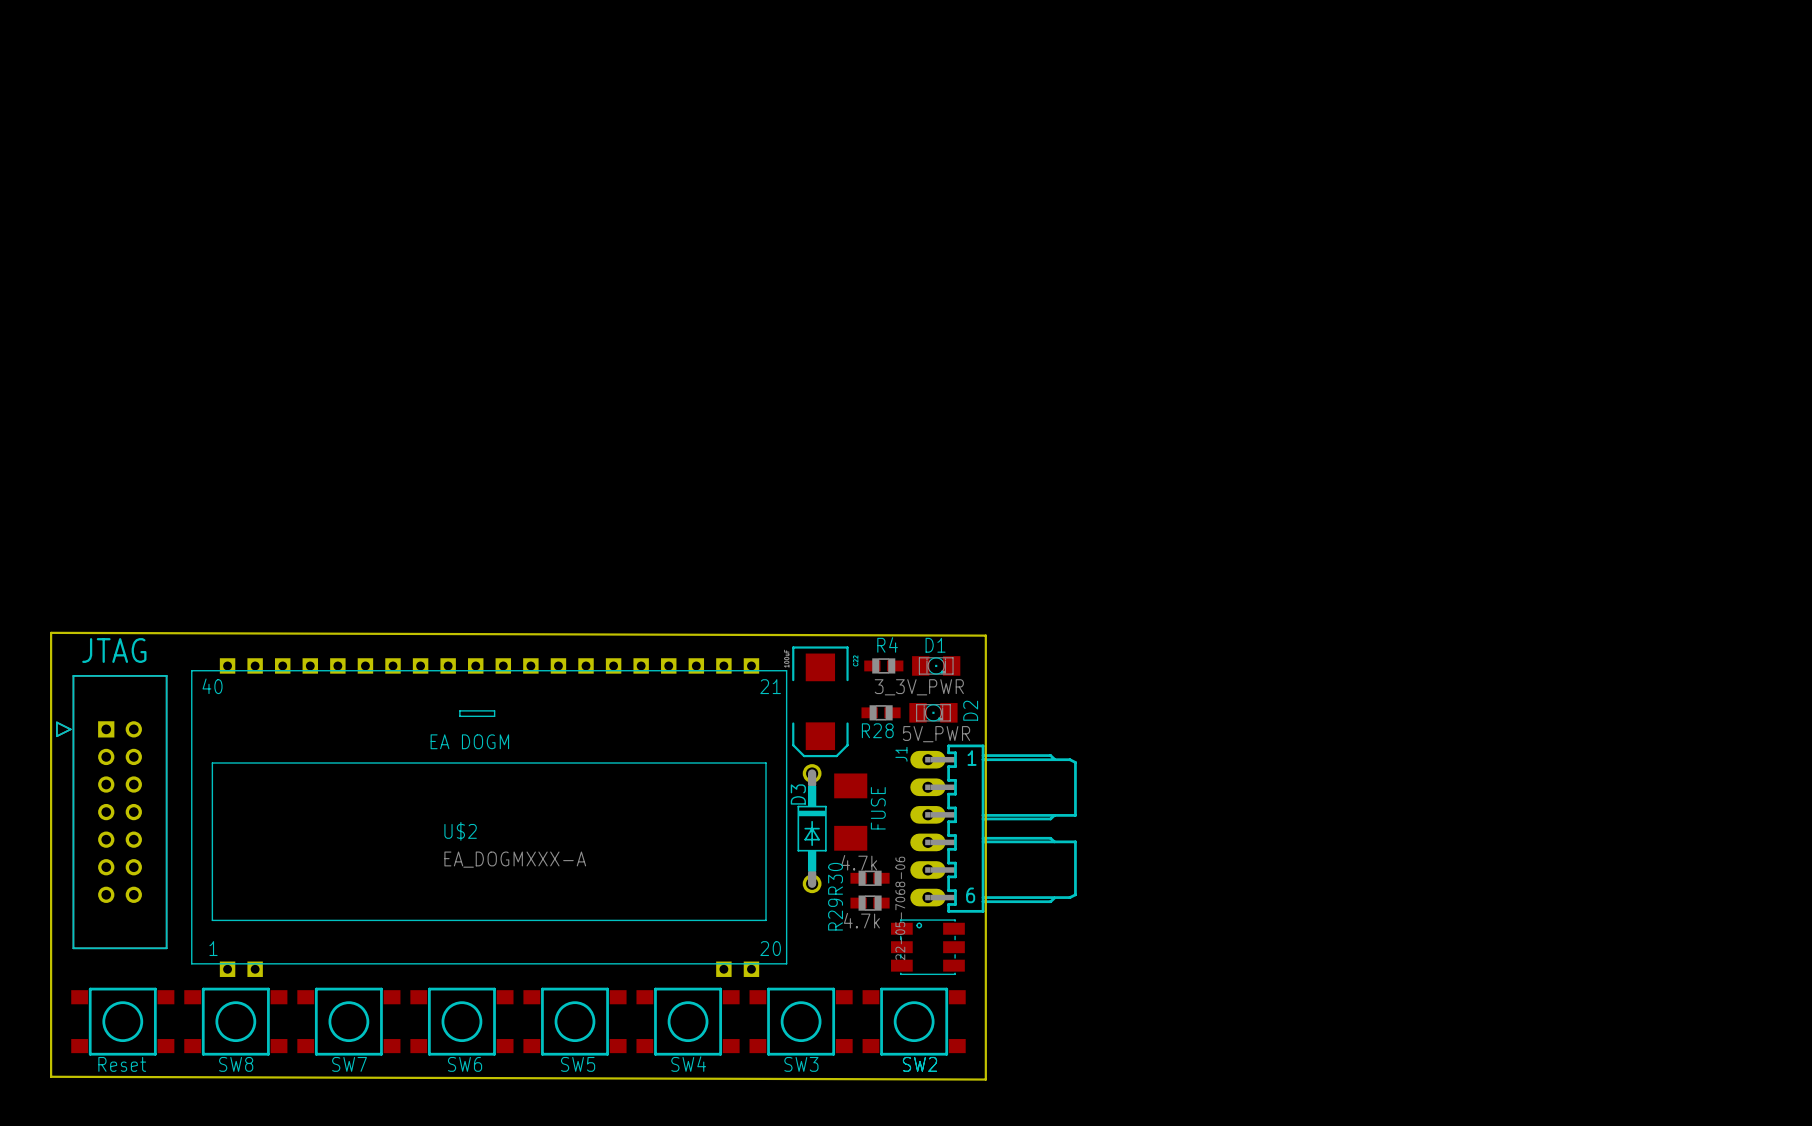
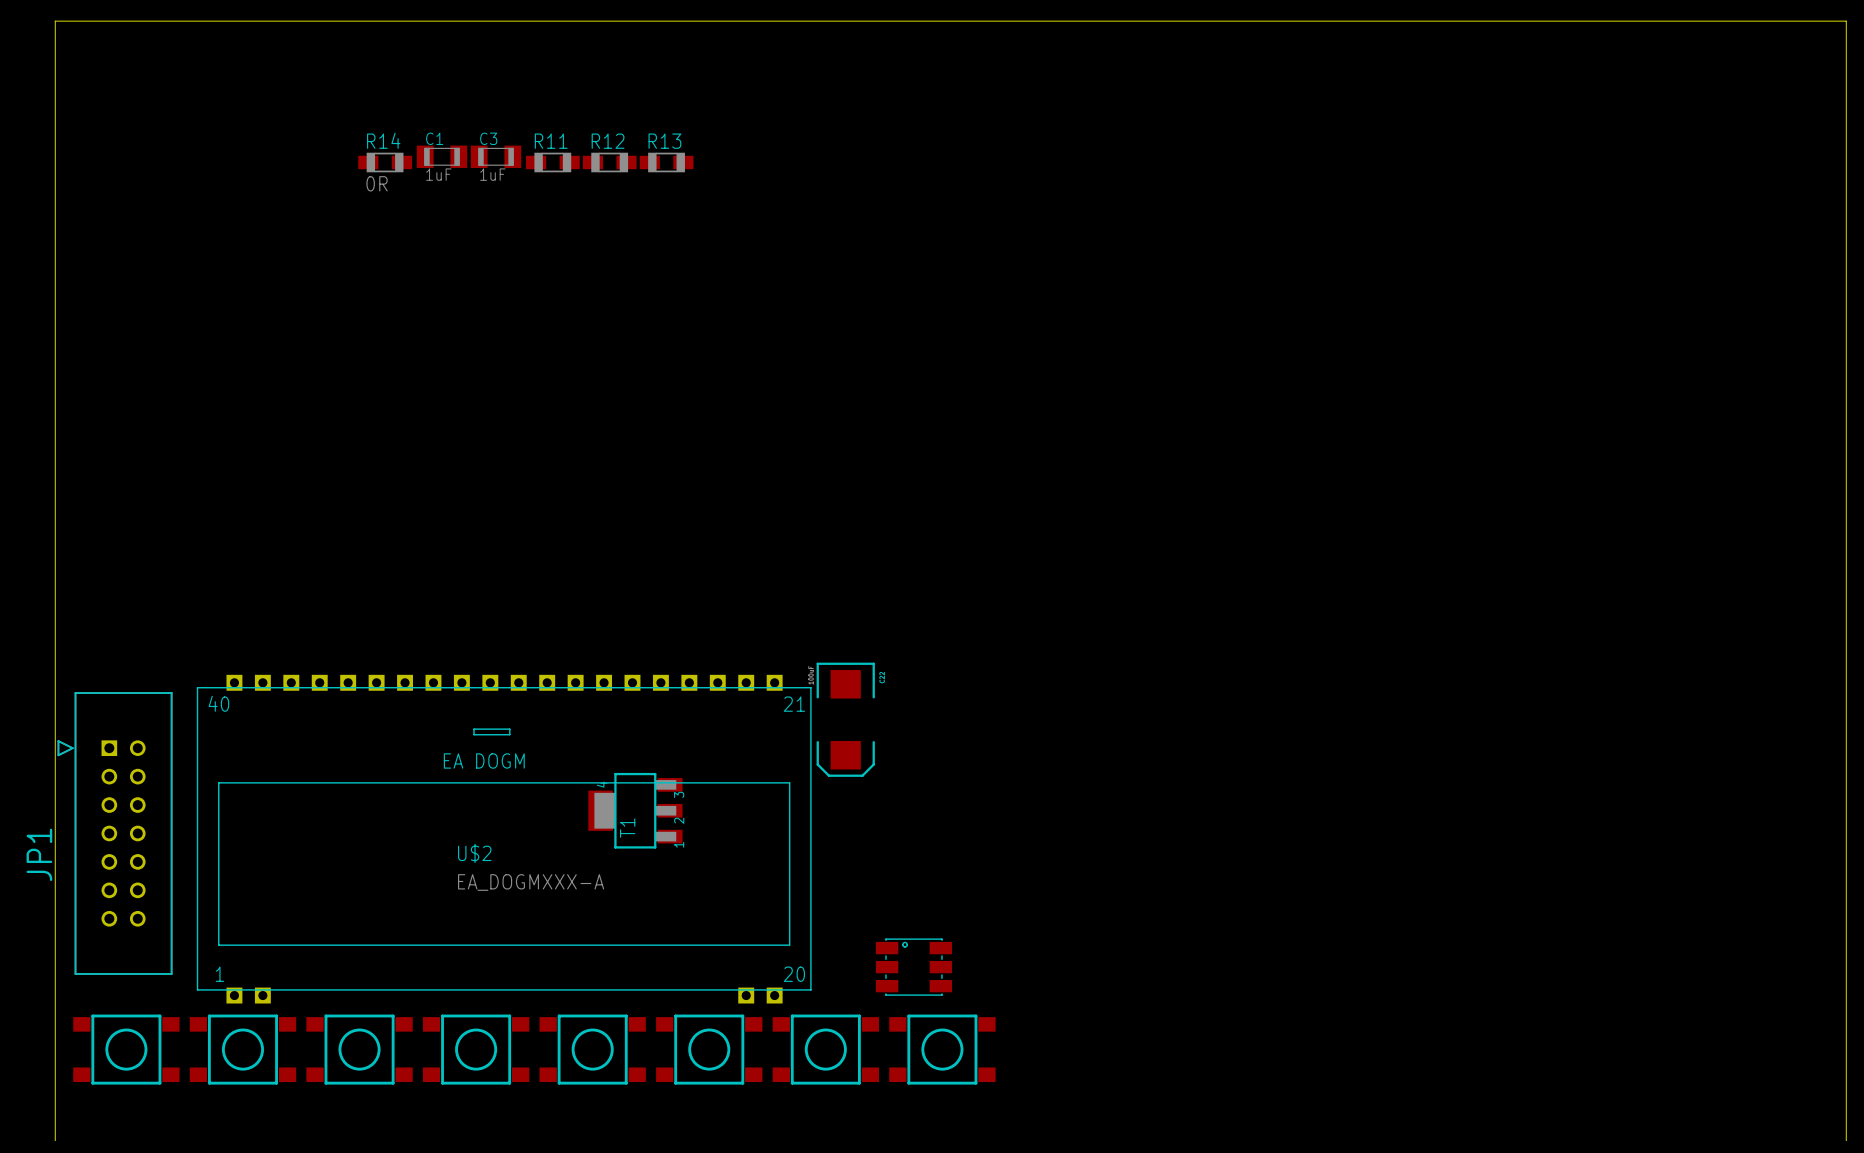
C1: none -> 1uF (442, 156)
C3: none -> 1uF (496, 156)
R14: none -> 0R (385, 162)
R11: none -> (552, 162)
R12: none -> (609, 162)
R13: none -> (666, 162)
board edge: (51, 632) (51, 1076) (985, 1079) (985, 635) (51, 632) -> none
R4: (883, 665) -> none
D1: 3_3V_PWR (936, 665) -> none
R28: (881, 712) -> none
D2: 5V_PWR (933, 712) -> none
T1: none -> (635, 810)
JTAG: (111, 812) -> none
JP1: none -> (115, 833)
part: (850, 812) -> none
D3: (812, 828) -> none
J1: 22-05-7068-06 (993, 828) -> none
R30: 4.7k (870, 878) -> none
R29: 4.7k (870, 903) -> none
part position: (927, 947) -> (913, 967)
text: Reset (122, 1064) -> none
text: SW8 (236, 1064) -> none
text: SW7 (349, 1064) -> none
text: SW6 (465, 1064) -> none
text: SW5 (578, 1064) -> none
text: SW4 (688, 1064) -> none
text: SW3 (801, 1064) -> none
text: SW2 (919, 1064) -> none
board edge: none -> (55, 1140) (55, 21) (1846, 21) (1846, 1140)

